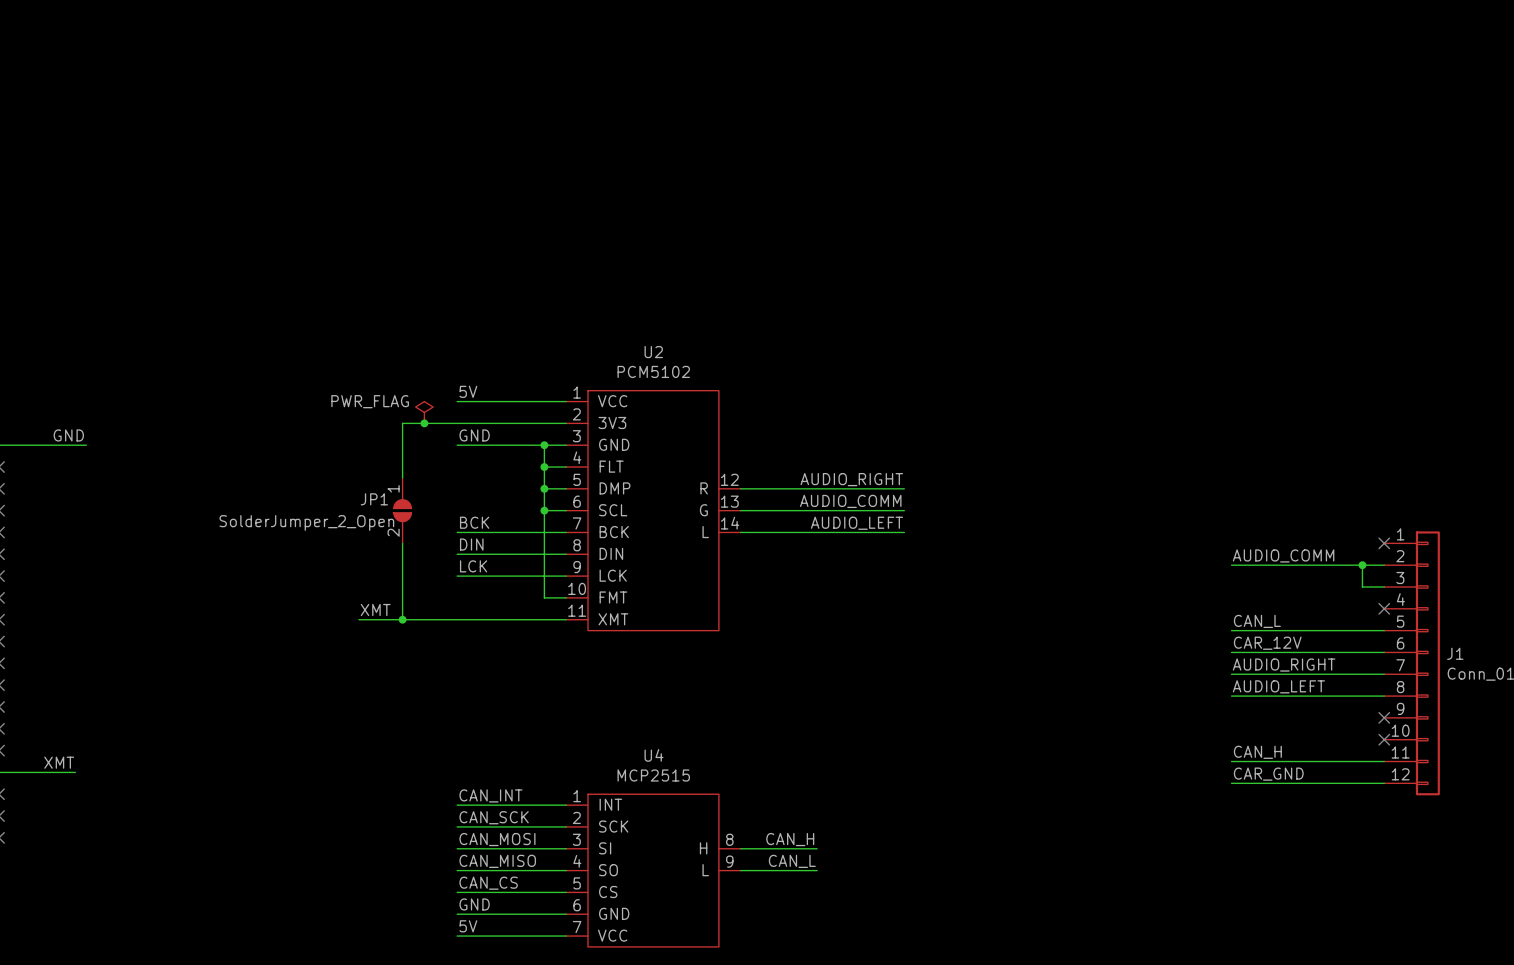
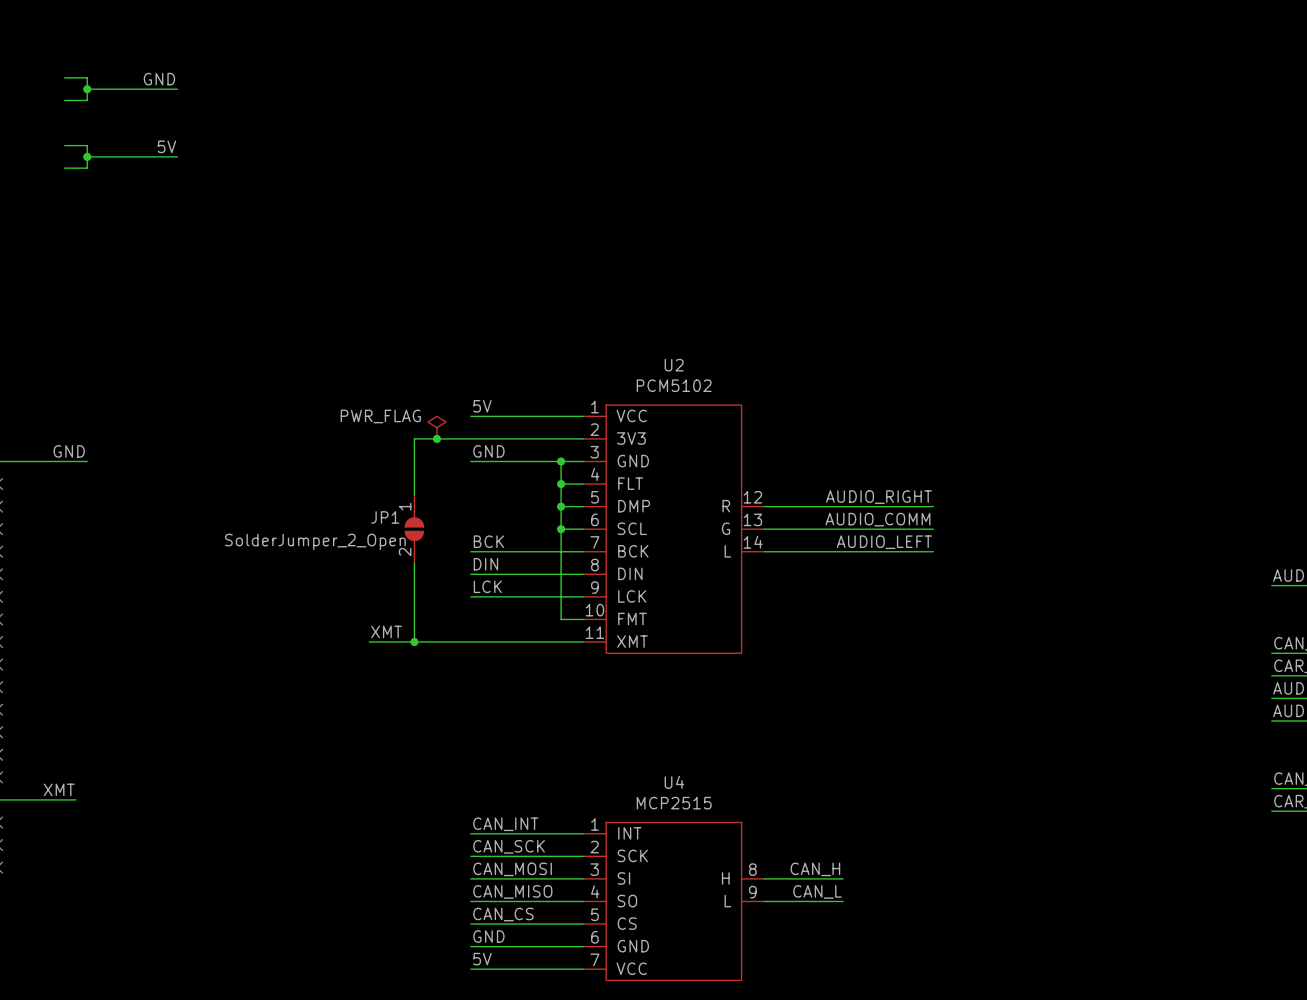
wire: none -> (64, 77) (87, 77) (87, 100) (64, 100)
label: none -> GND (159, 79)
wire: none -> (87, 89) (177, 89)
junction: none -> (87, 89)
wire: none -> (64, 145) (87, 145) (87, 168) (64, 168)
label: none -> 5V (166, 146)
wire: none -> (87, 156) (177, 156)
junction: none -> (87, 156)

